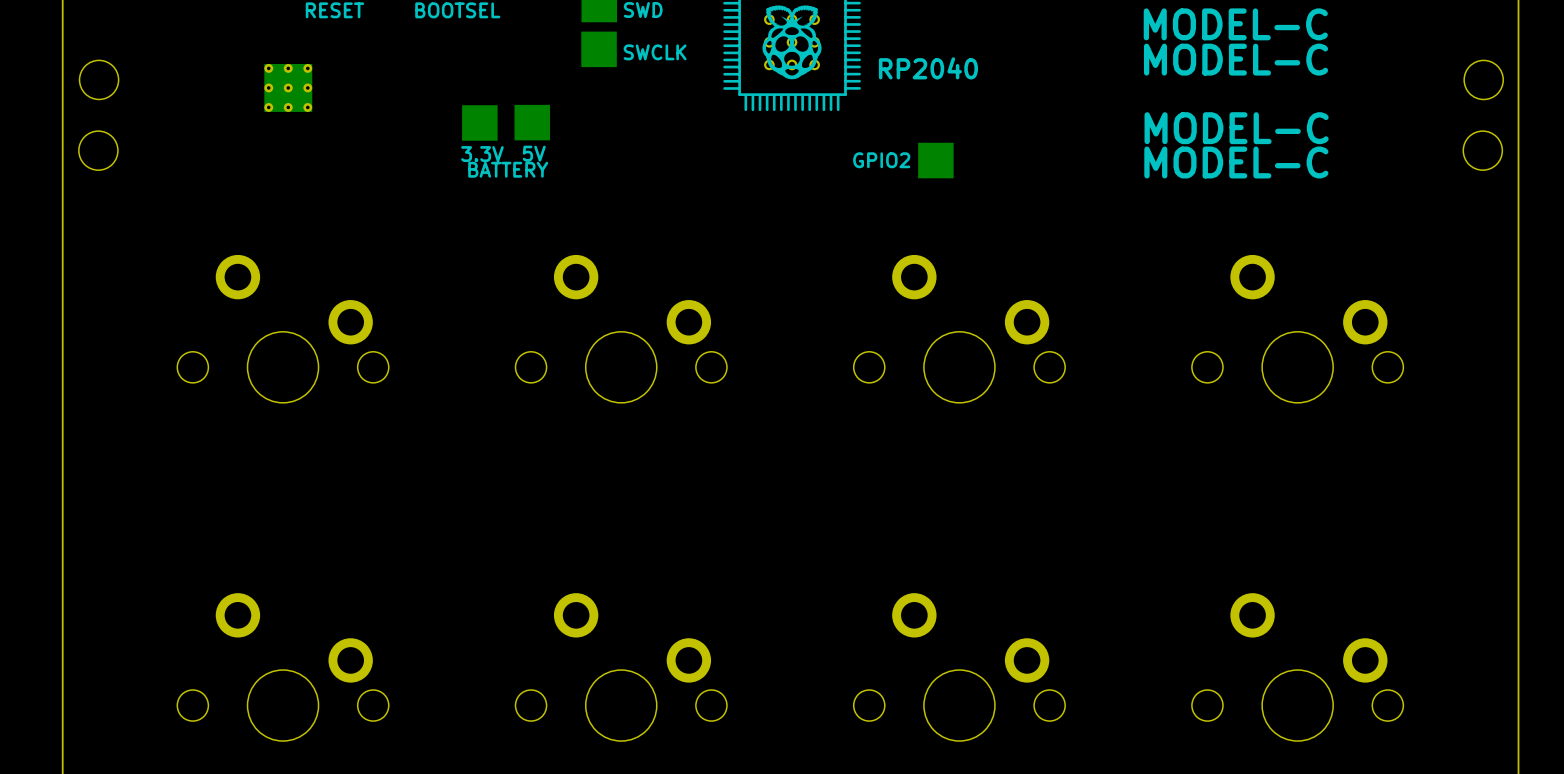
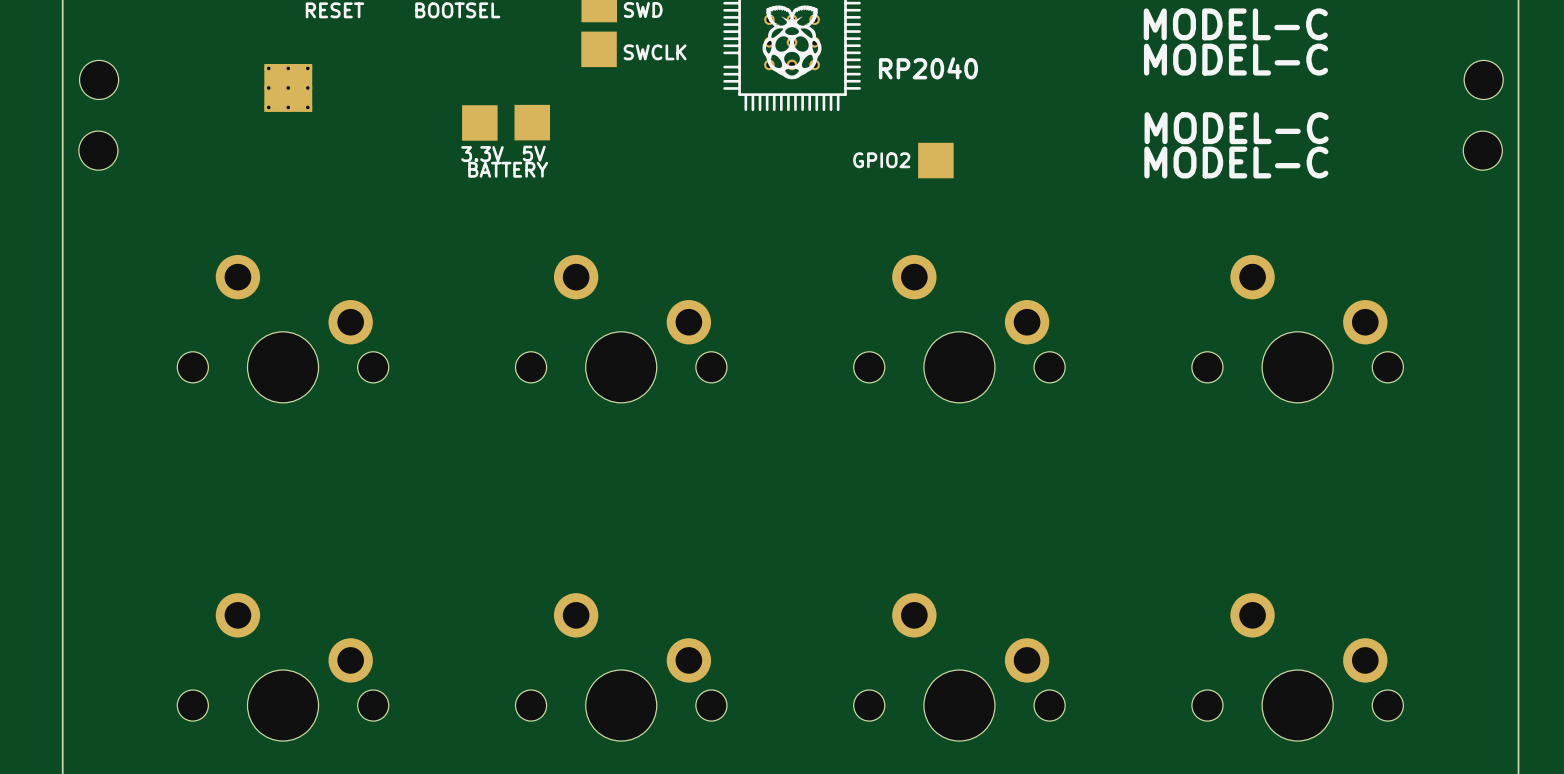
line: (738, 59) (724, 59) -> none

